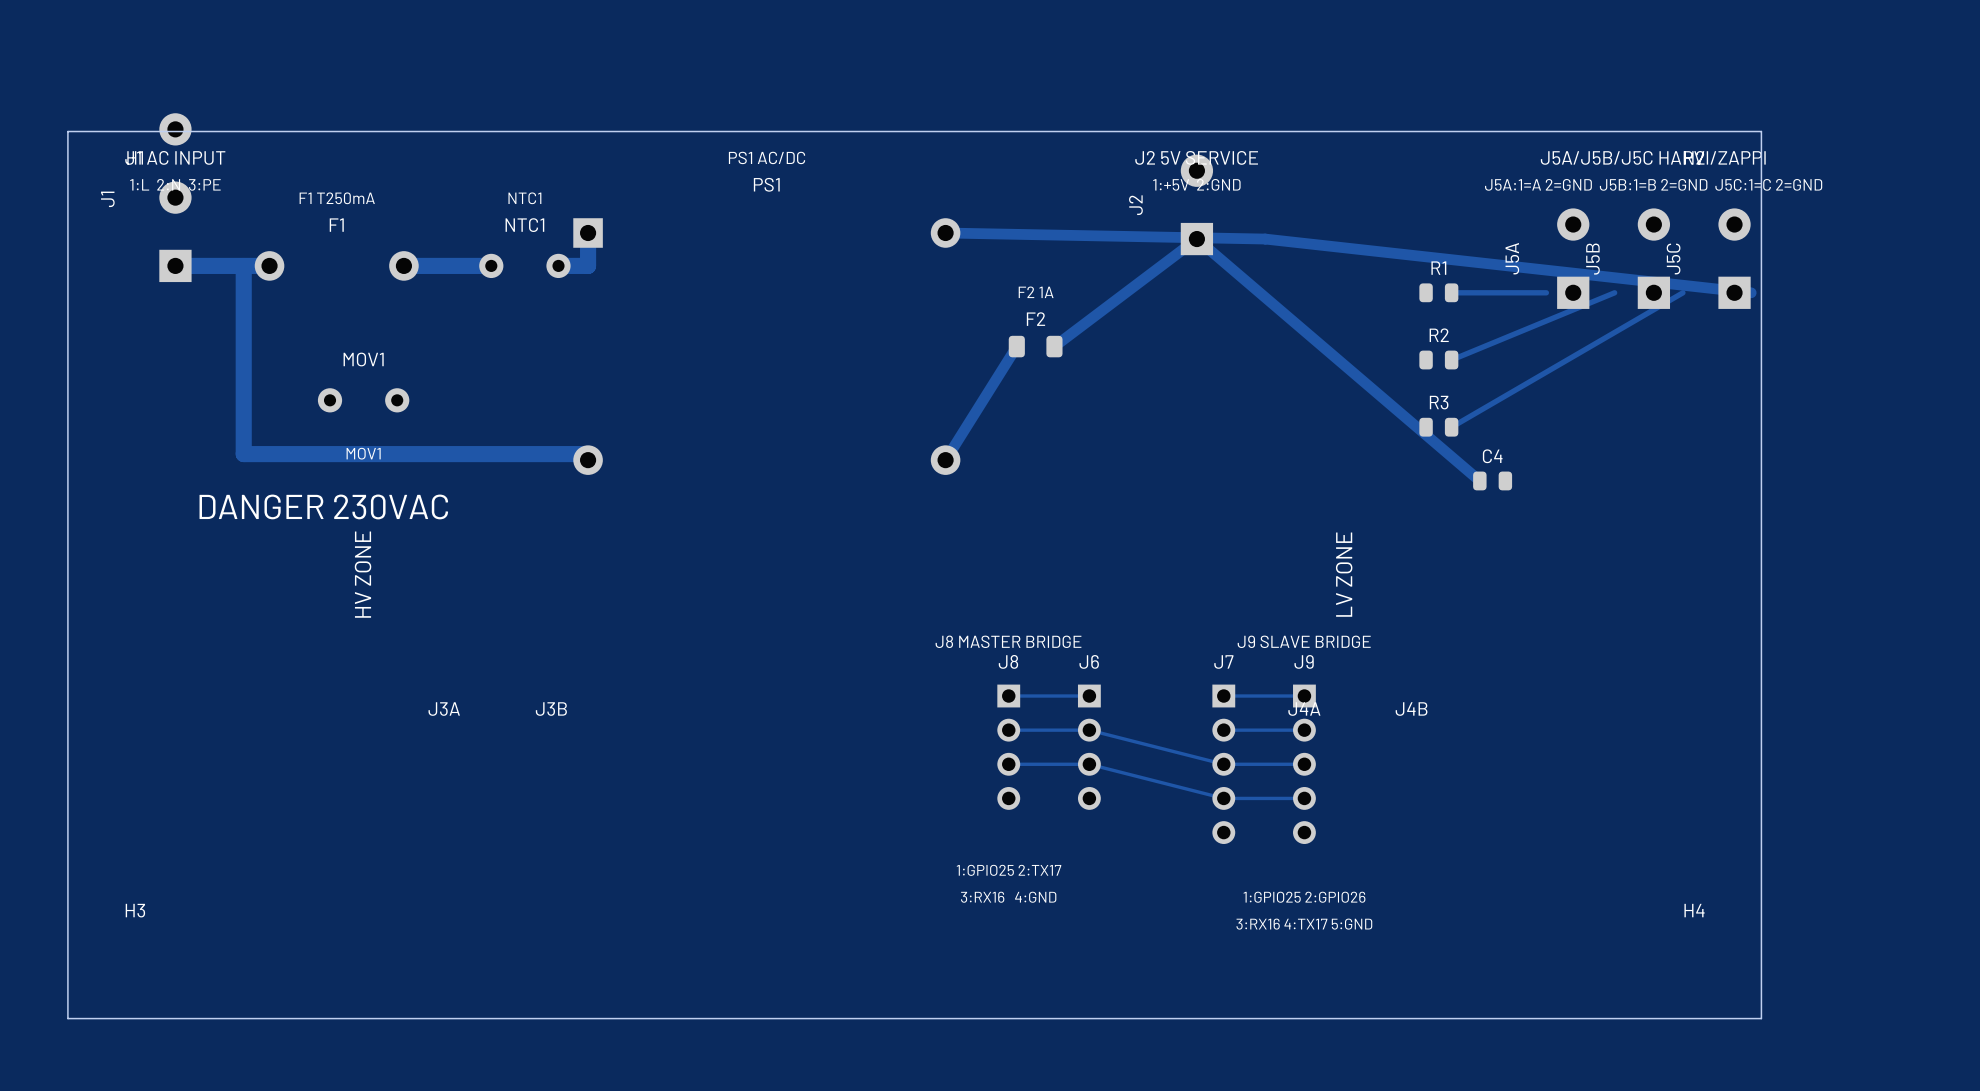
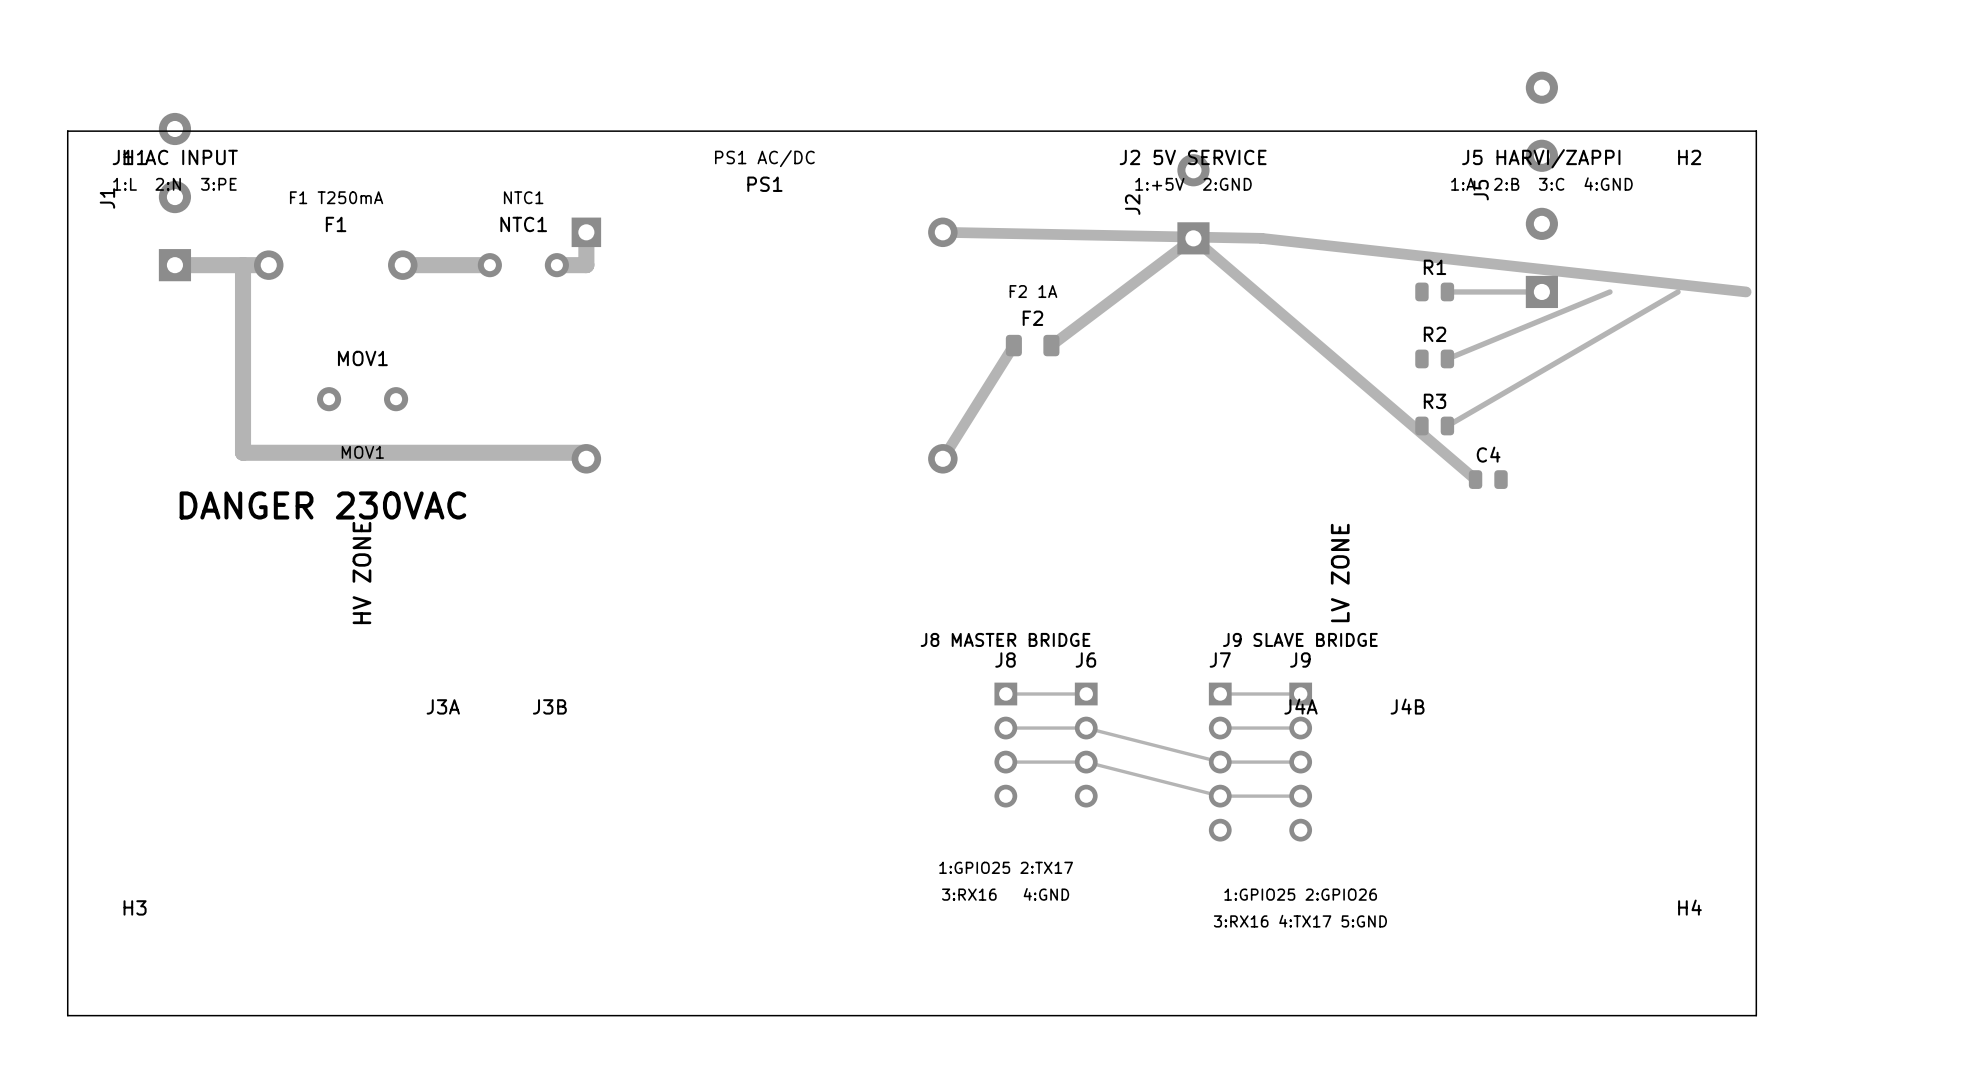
text: J5A/J5B/J5C HARVI/ZAPPI (1653, 157) -> J5 HARVI/ZAPPI (1541, 158)
text: none -> 1:A 2:B 3:C 4:GND (1541, 184)
text: J5A:1=A 2=GND J5B:1=B 2=GND J5C:1=C 2=GND (1653, 184) -> none
J5: none -> (1541, 189)
J5A: (1573, 258) -> none
J5B: (1653, 258) -> none
J5C: (1734, 258) -> none

